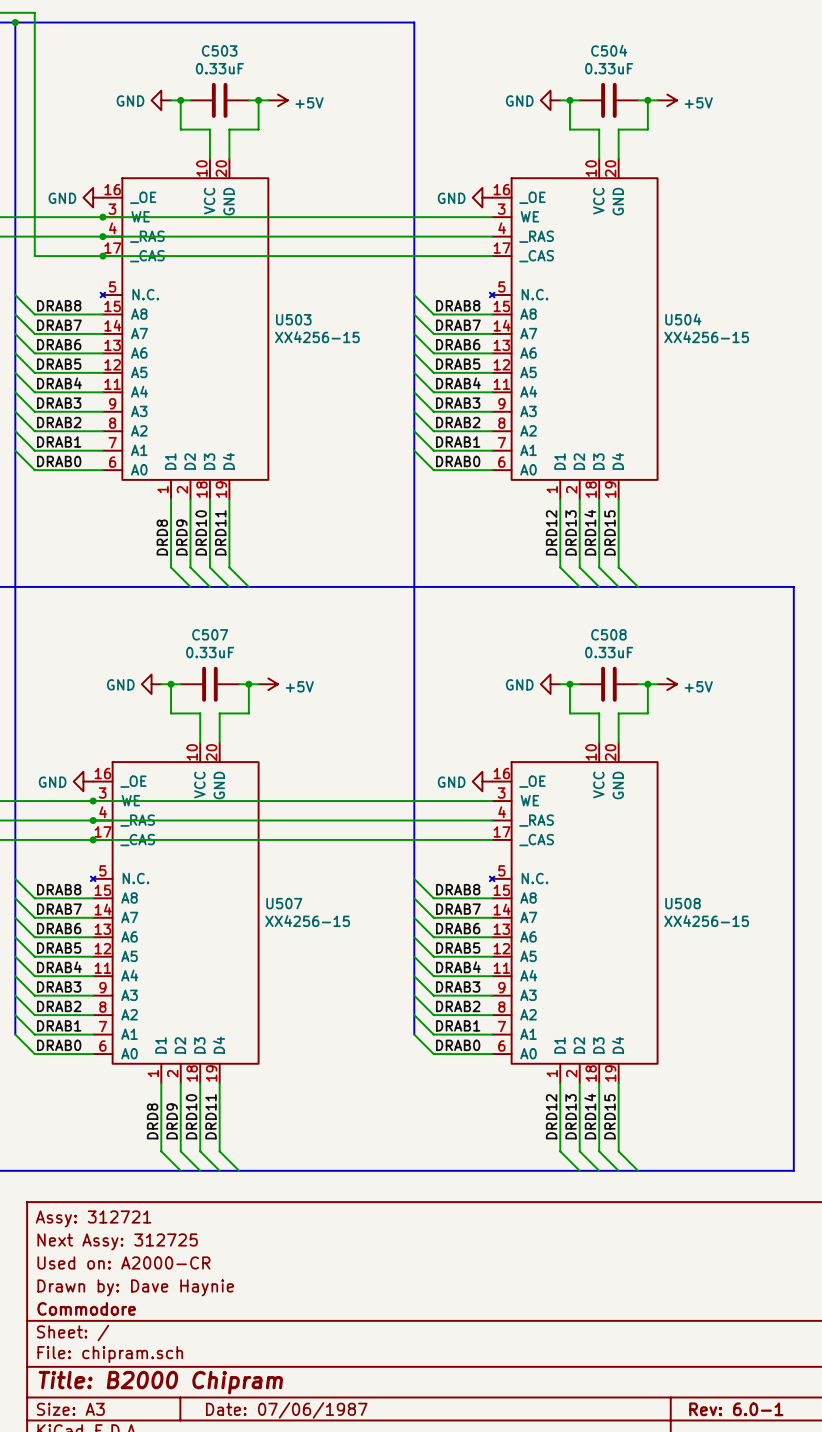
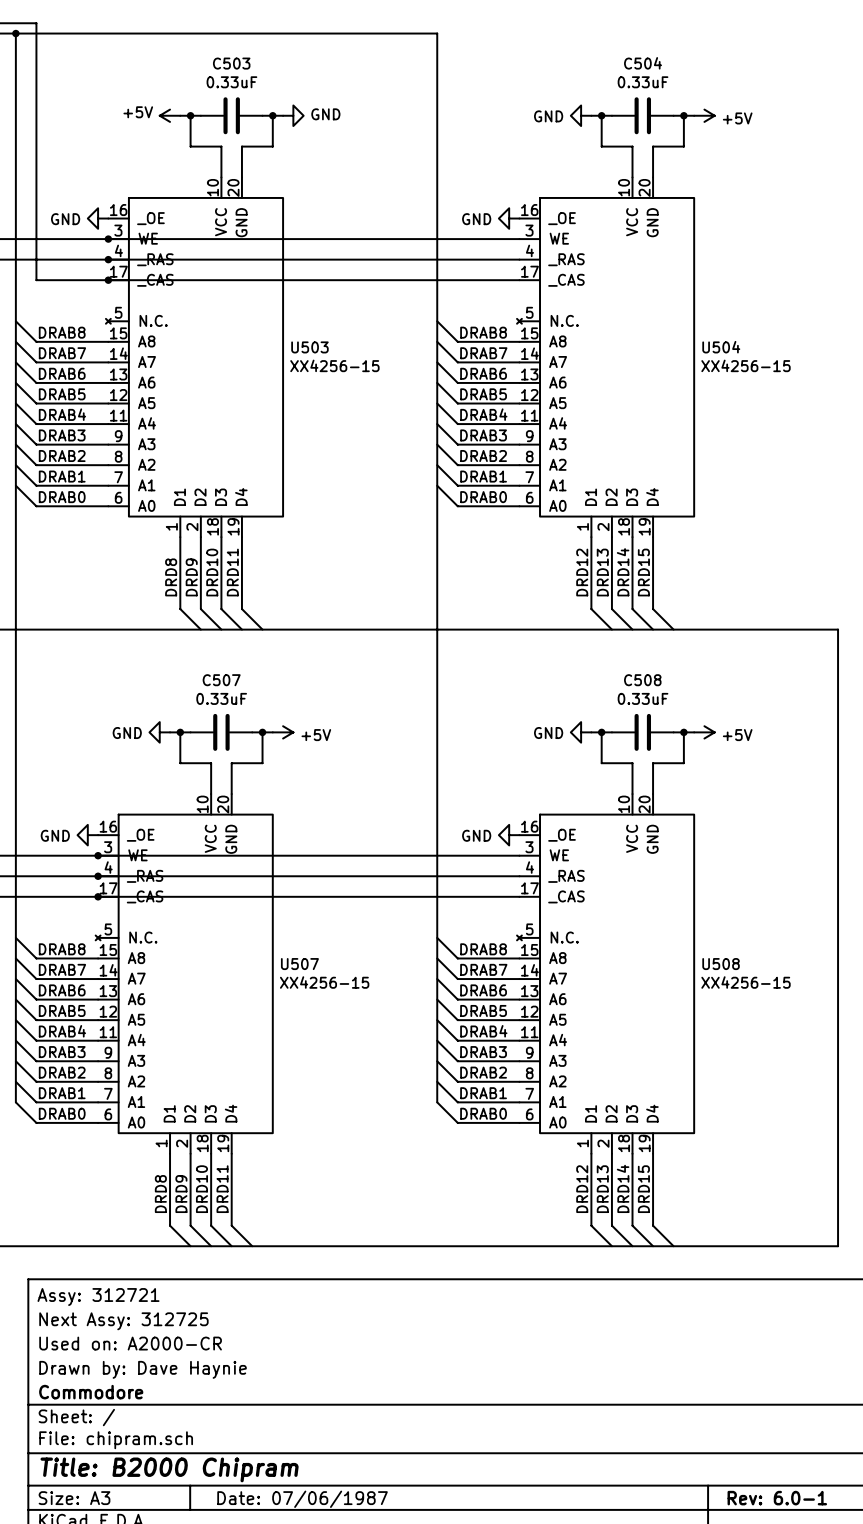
power symbol: GND (161, 100) -> +5V (170, 115)
power symbol: +5V (278, 100) -> GND (293, 115)

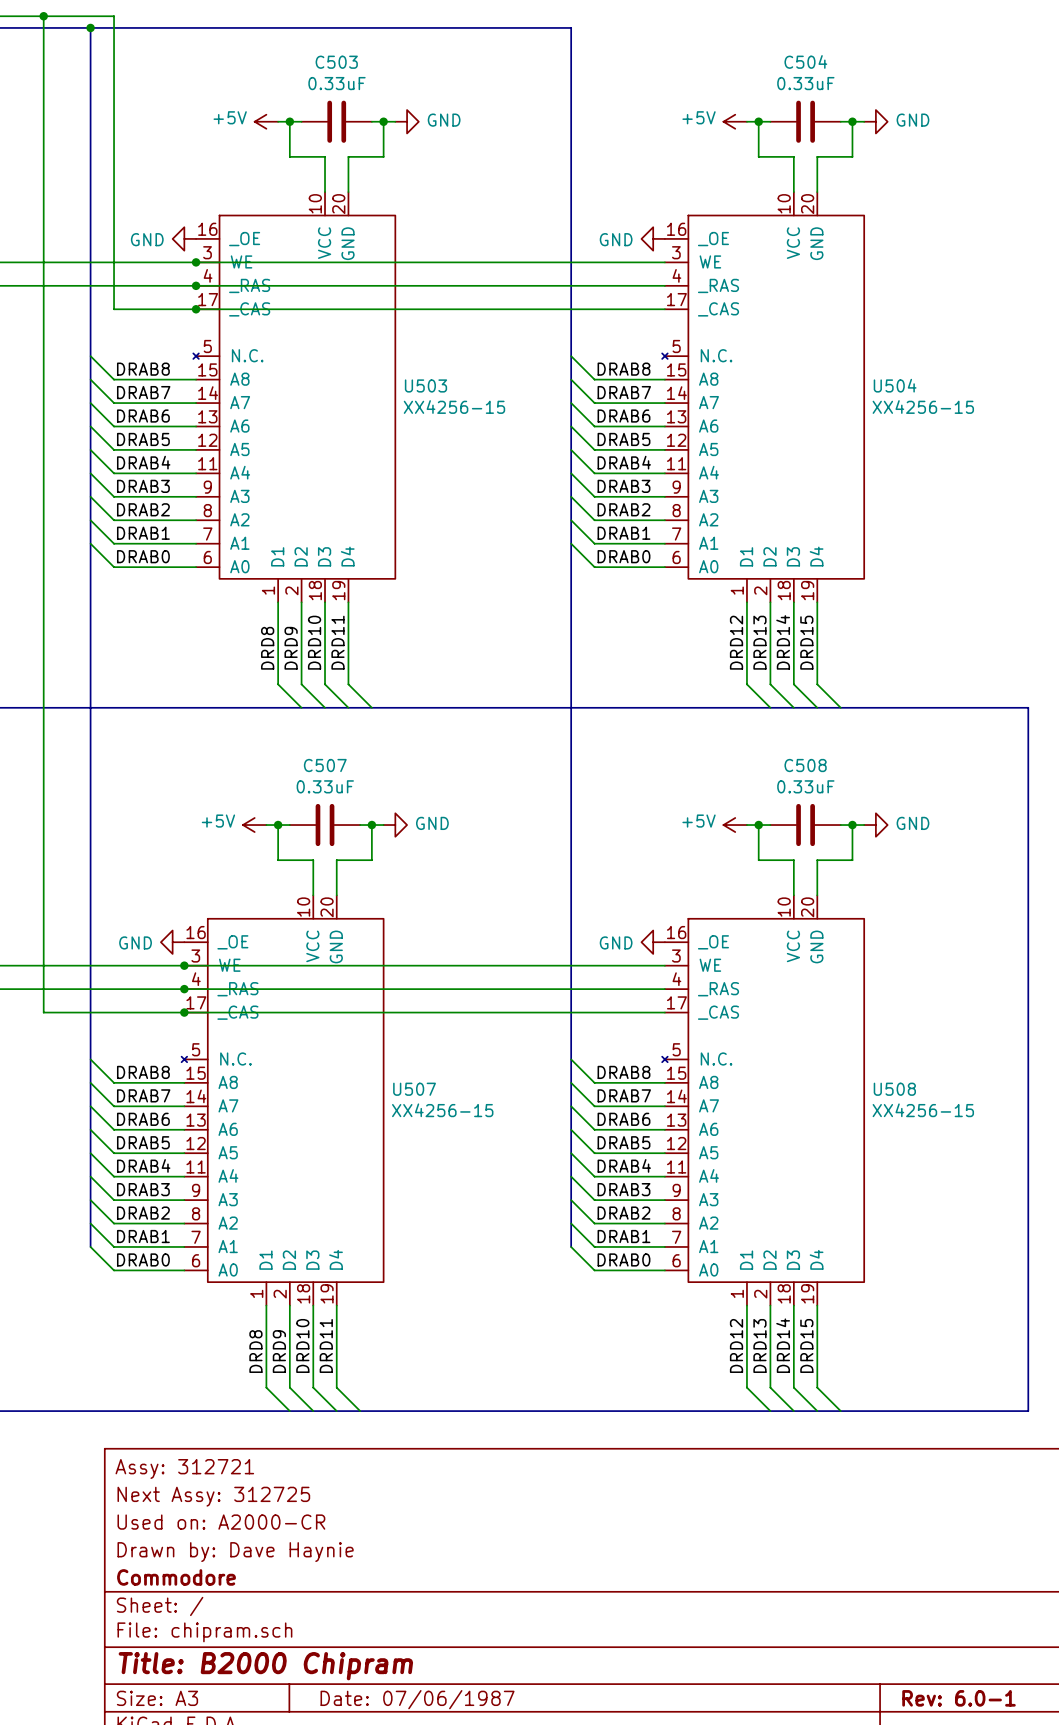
power symbol: GND (581, 115) -> +5V (735, 121)
power symbol: +5V (704, 115) -> GND (875, 121)
power symbol: GND (159, 732) -> +5V (254, 825)
power symbol: +5V (283, 732) -> GND (395, 825)
power symbol: GND (581, 732) -> +5V (735, 825)
power symbol: +5V (704, 732) -> GND (875, 825)

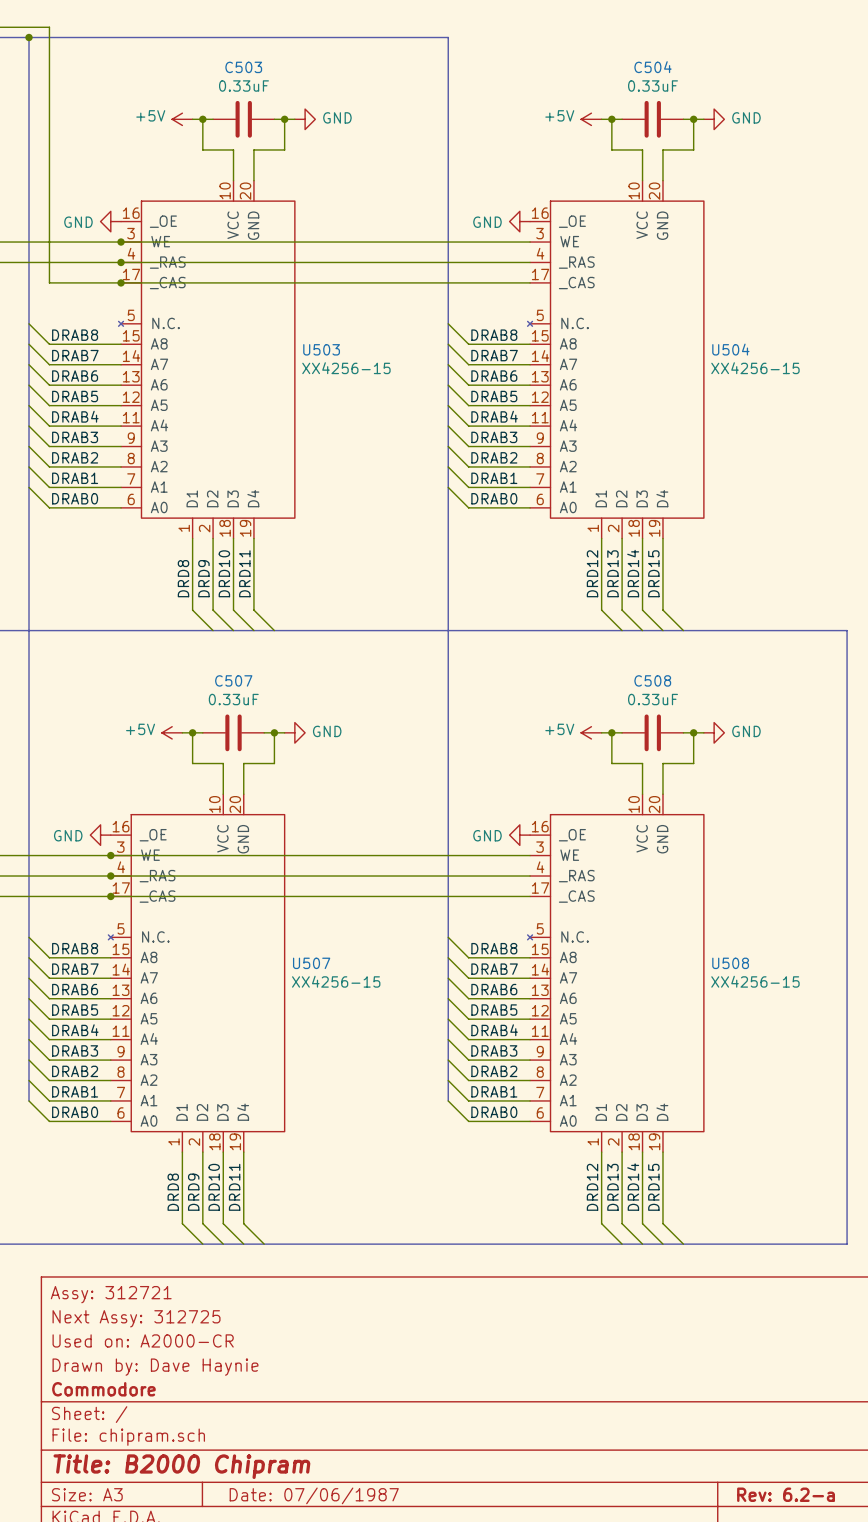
title block: Rev: 6.0-1 (959, 1698) -> Rev: 6.2-a (786, 1494)

